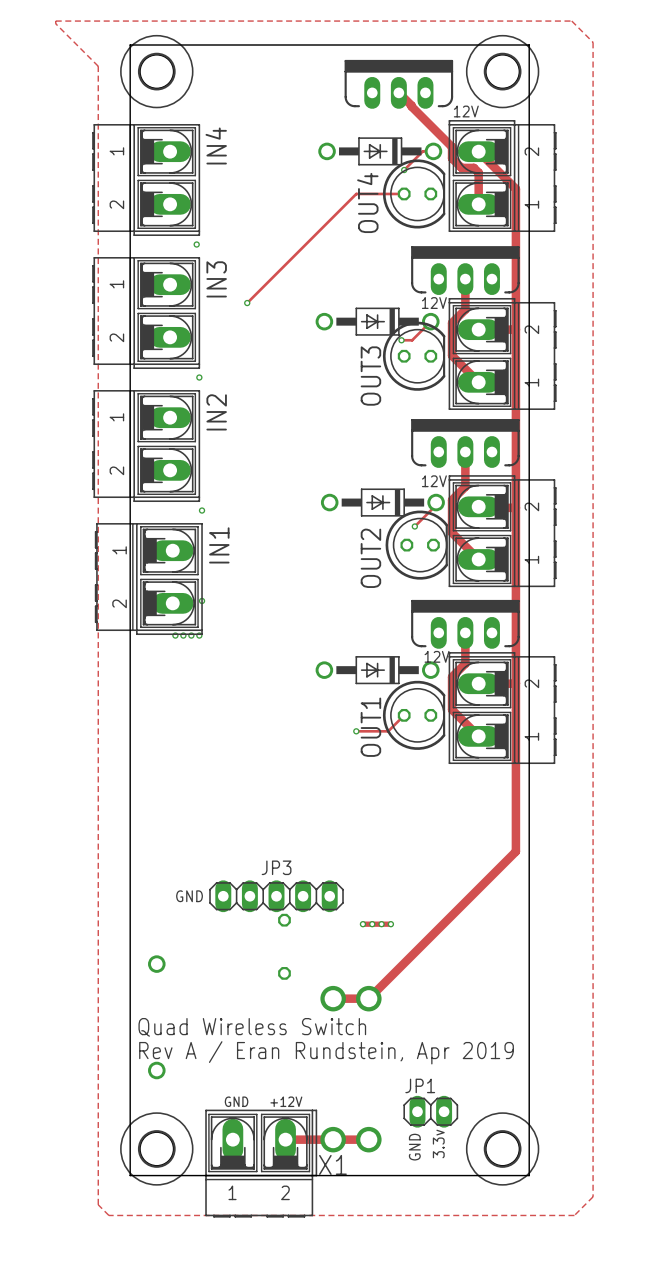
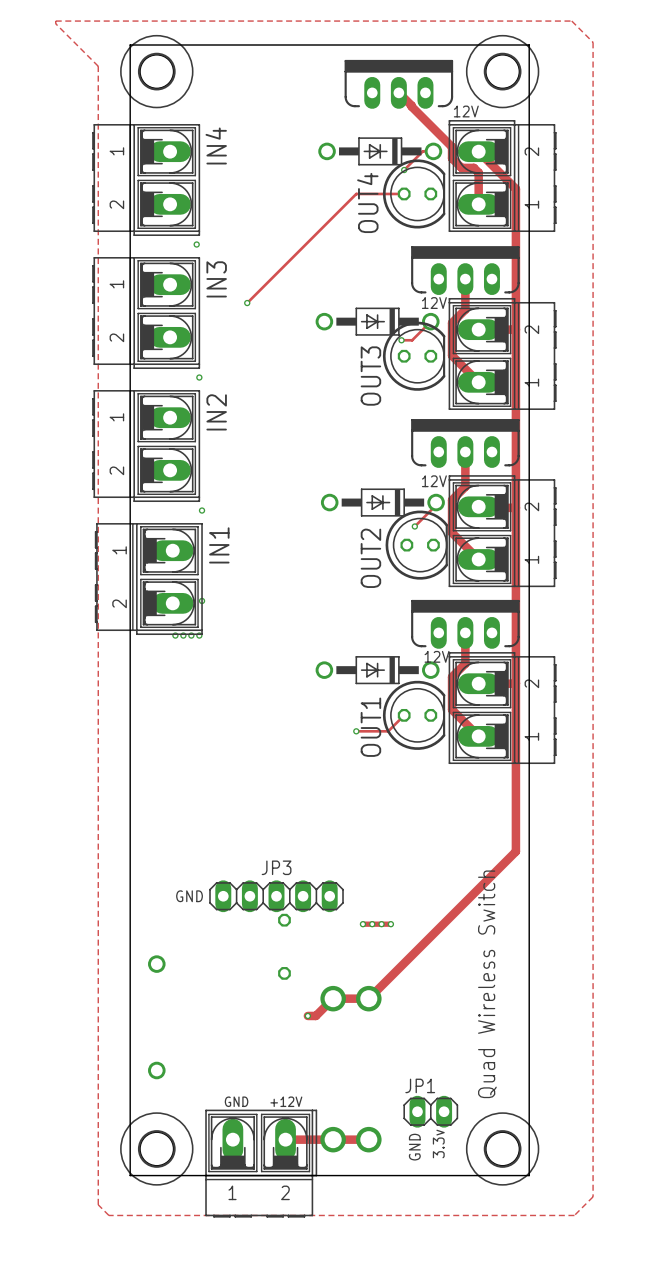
text: none -> Quad Wireless Switch (487, 984)
track: none -> (333, 998) (315, 1015) (307, 1015)
via: none -> (307, 1015)
text: Quad Wireless Switch (252, 1027) -> none
text: Rev A / Eran Rundstein, Apr 2019 (326, 1052) -> none
X1 name: X1 (332, 1164) -> none

